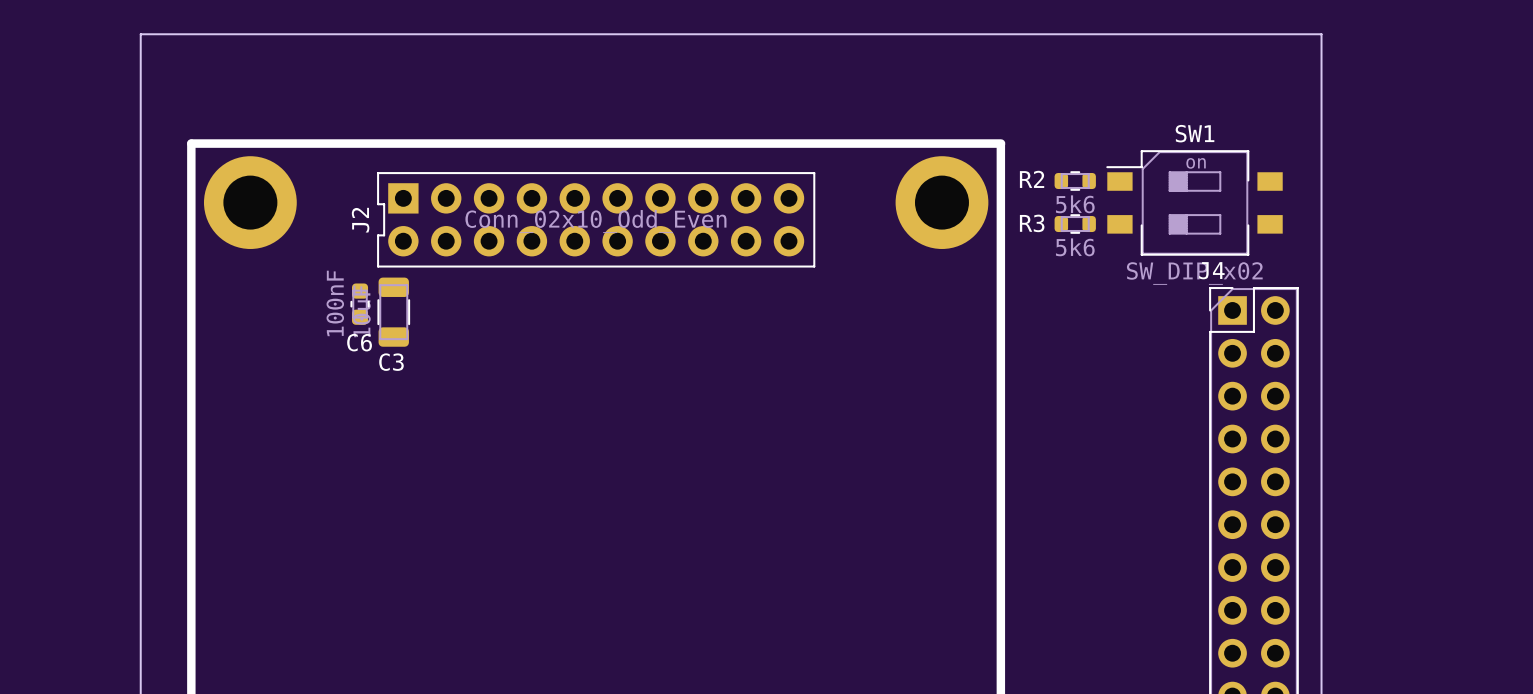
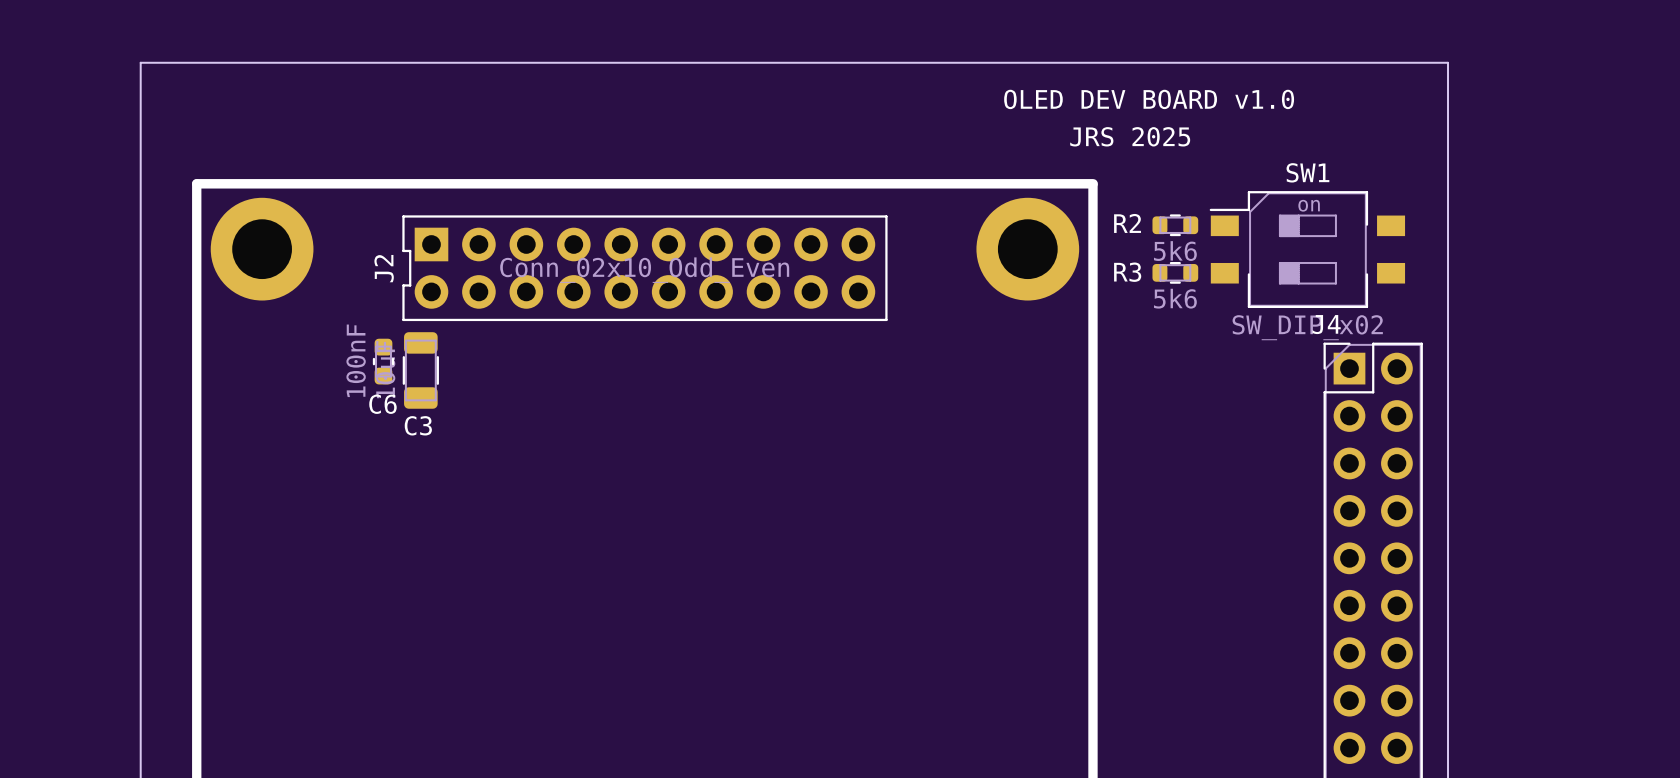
text: none -> OLED DEV BOARD v1.0 (1149, 99)
text: none -> JRS 2025 (1130, 136)

